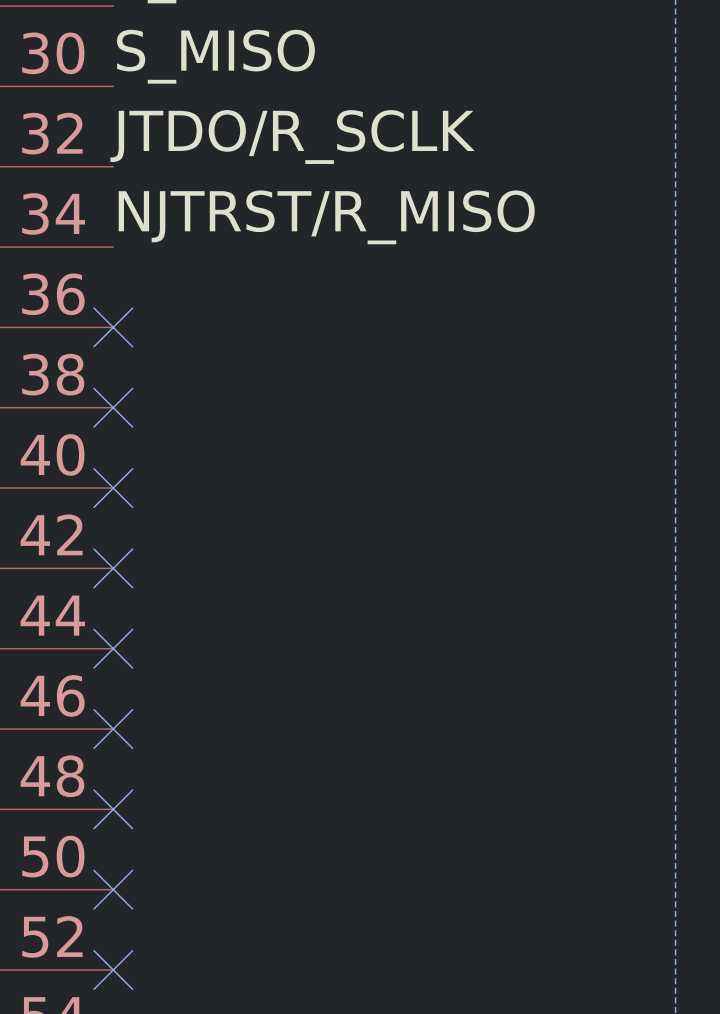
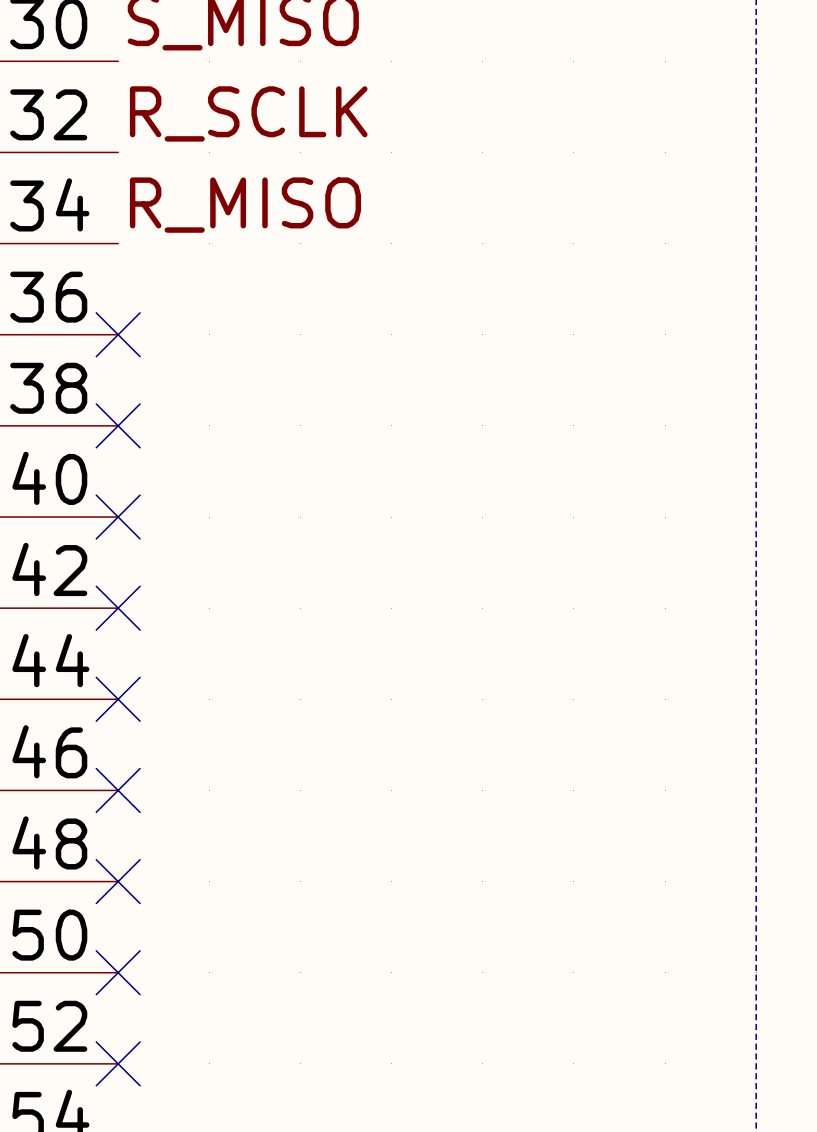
label: JTDO/R_SCLK (292, 137) -> R_SCLK (248, 113)
label: NJTRST/R_MISO (326, 217) -> R_MISO (245, 205)

